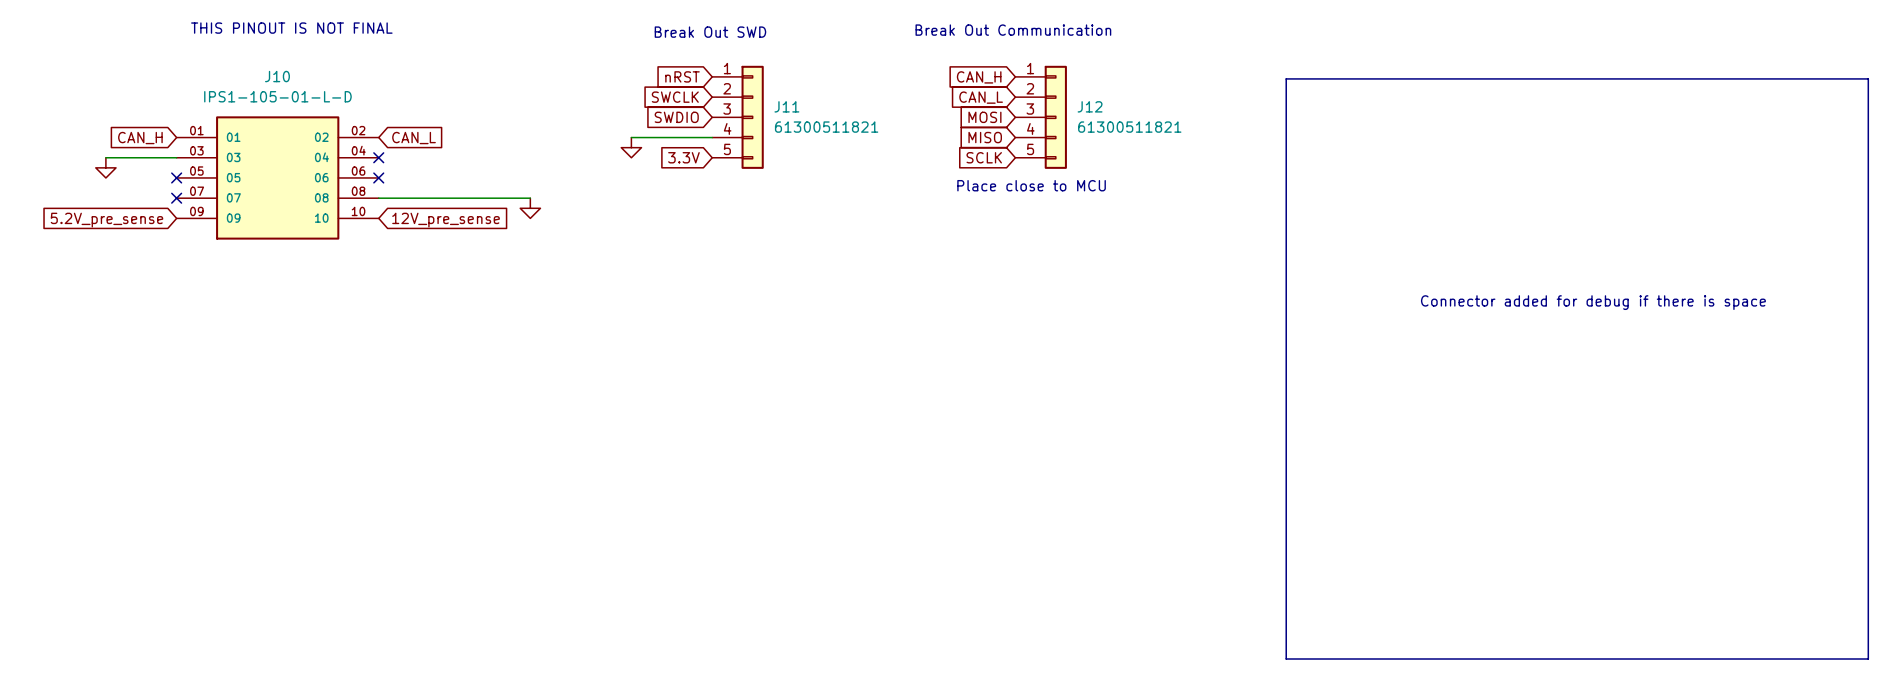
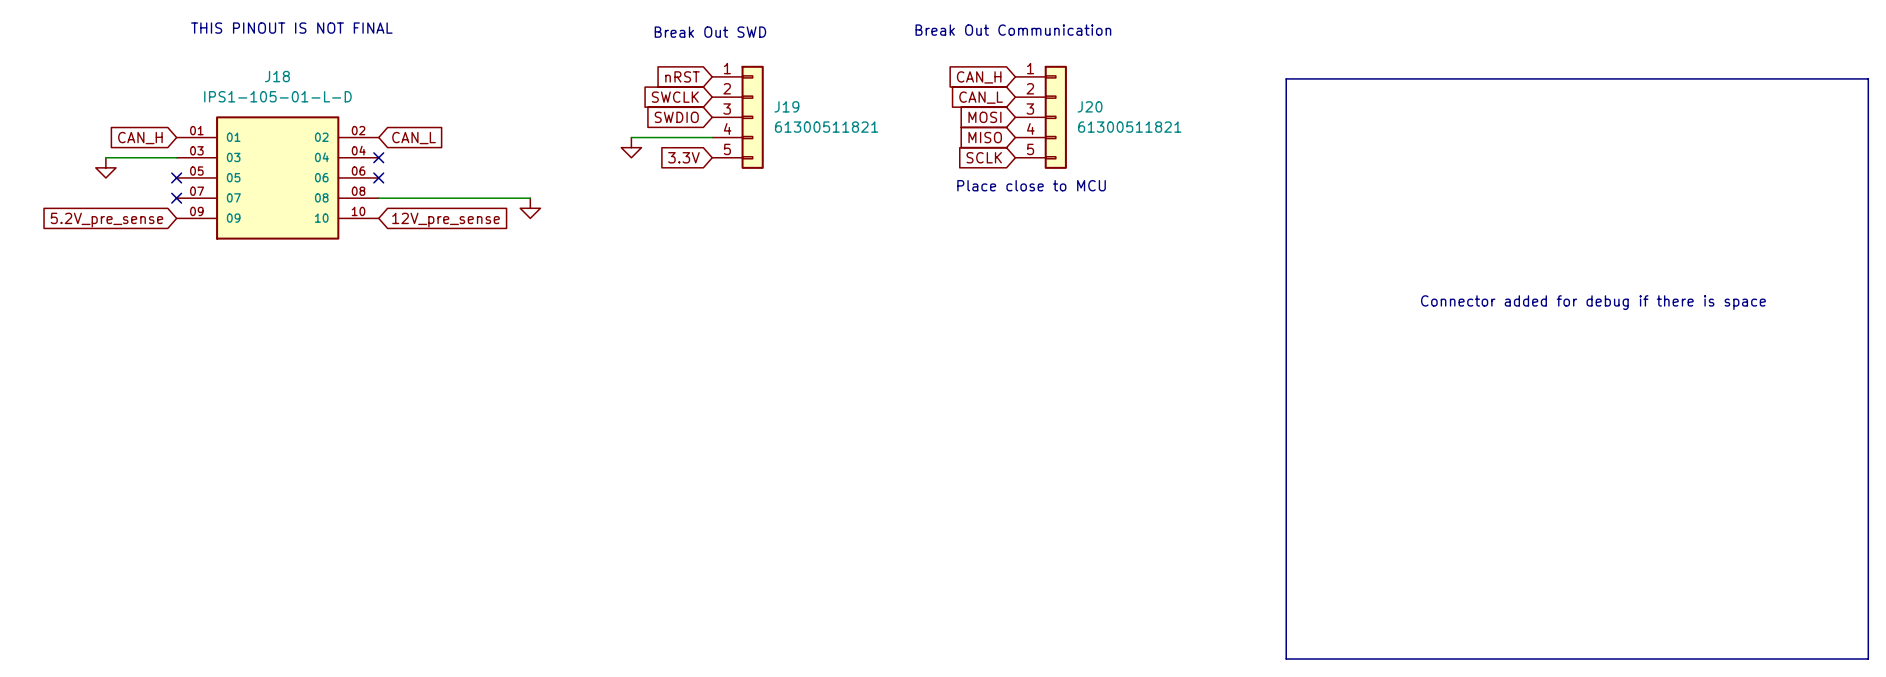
J10 name: J10 (277, 76) -> J18 (277, 76)
J11 name: J11 (786, 106) -> J19 (786, 106)
J12 name: J12 (1090, 106) -> J20 (1090, 106)

